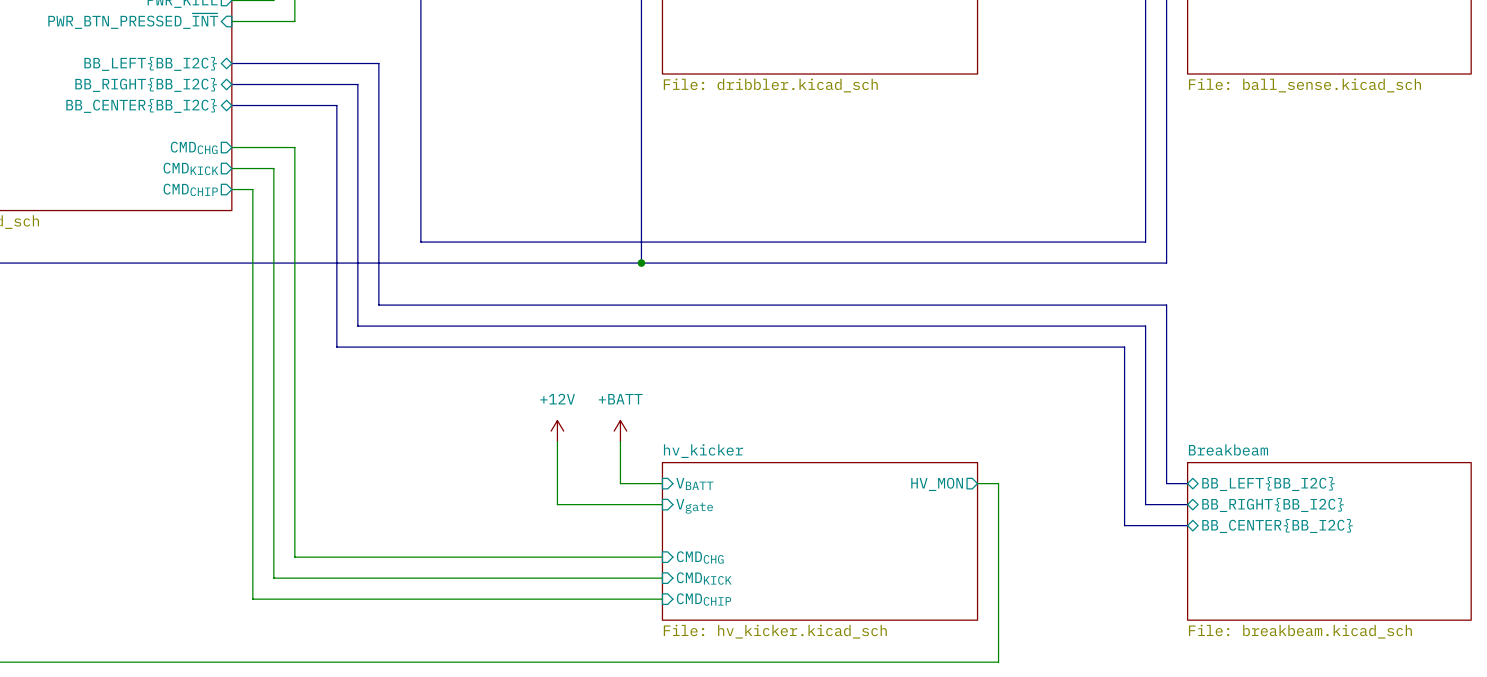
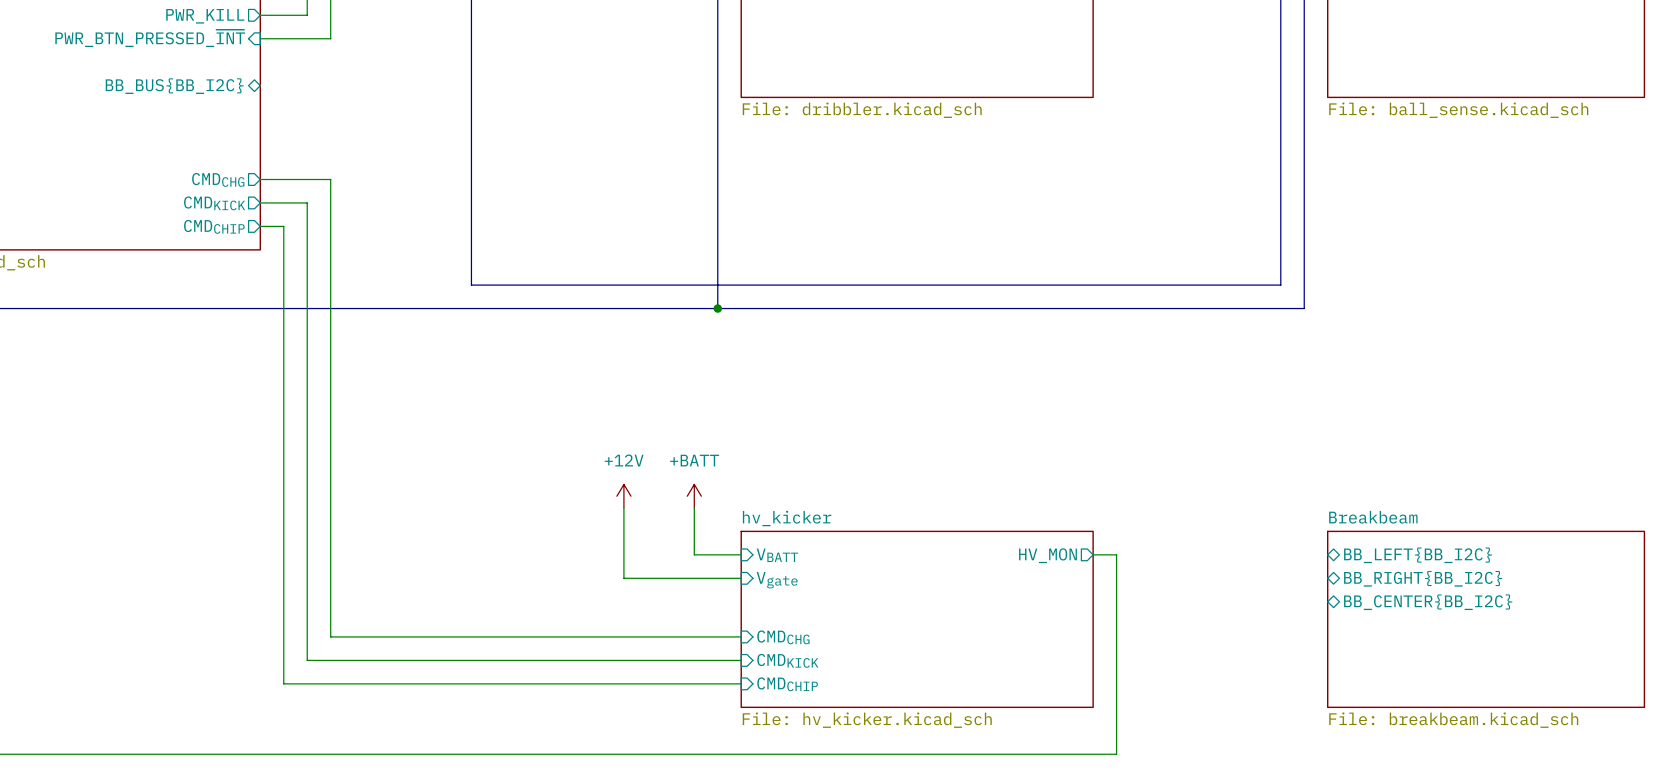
sheet pin: BB_LEFT{BB_I2C} (150, 63) -> BB_BUS{BB_I2C} (174, 86)
bus: (231, 63) (378, 63) (378, 305) (1166, 305) (1166, 483) (1187, 483) -> none
sheet pin: BB_RIGHT{BB_I2C} (146, 84) -> none
bus: (231, 84) (357, 84) (357, 326) (1145, 326) (1145, 504) (1187, 504) -> none
sheet pin: BB_CENTER{BB_I2C} (141, 105) -> none
bus: (231, 105) (336, 105) (336, 347) (1124, 347) (1124, 525) (1187, 525) -> none

